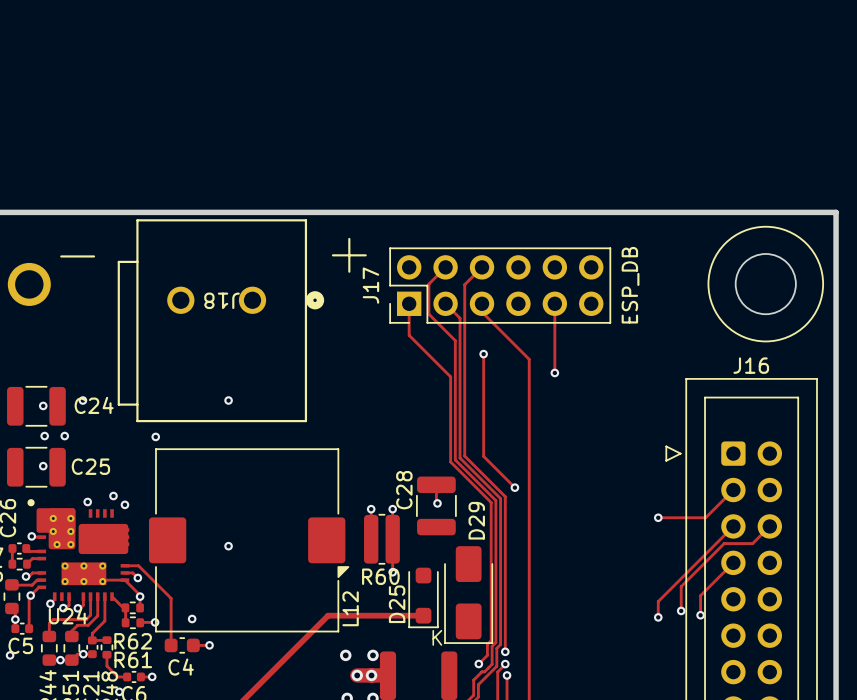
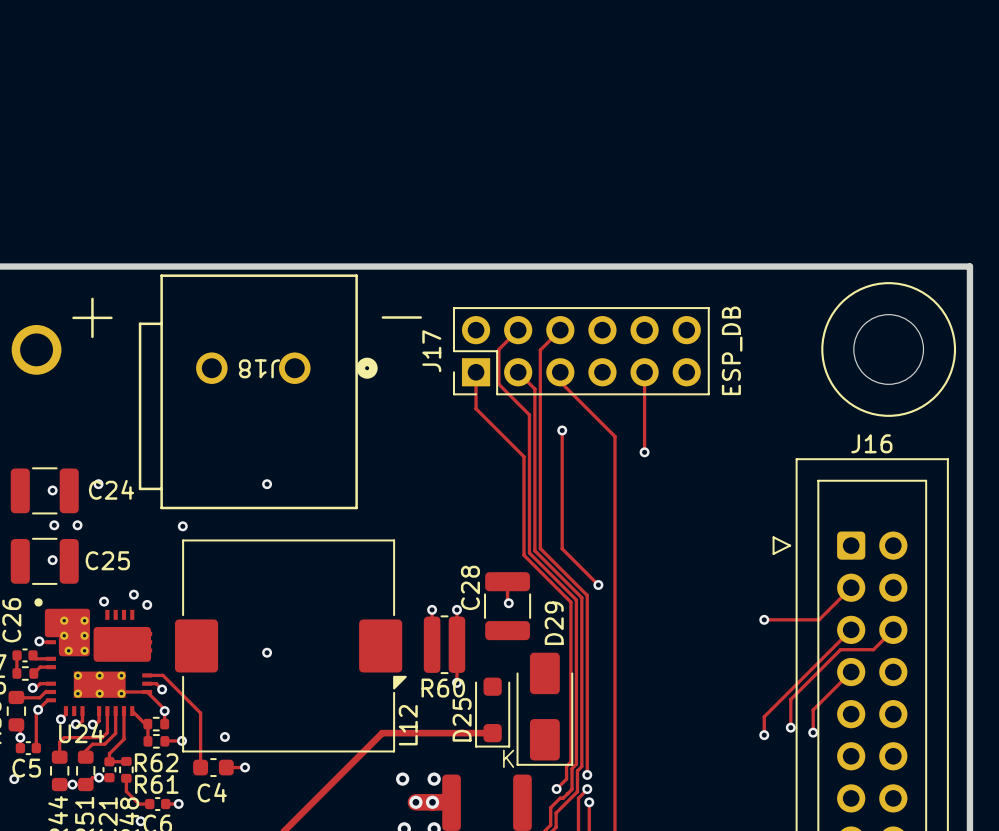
text position: + (349, 255) -> + (92, 317)
text position: _ (77, 256) -> _ (401, 317)

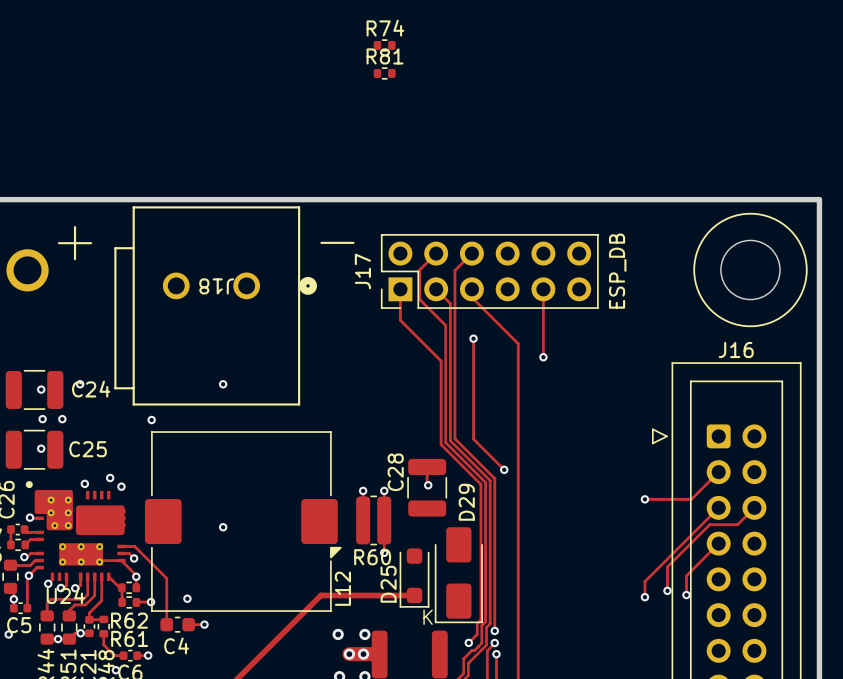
R74: none -> (384, 45)
R81: none -> (384, 73)

